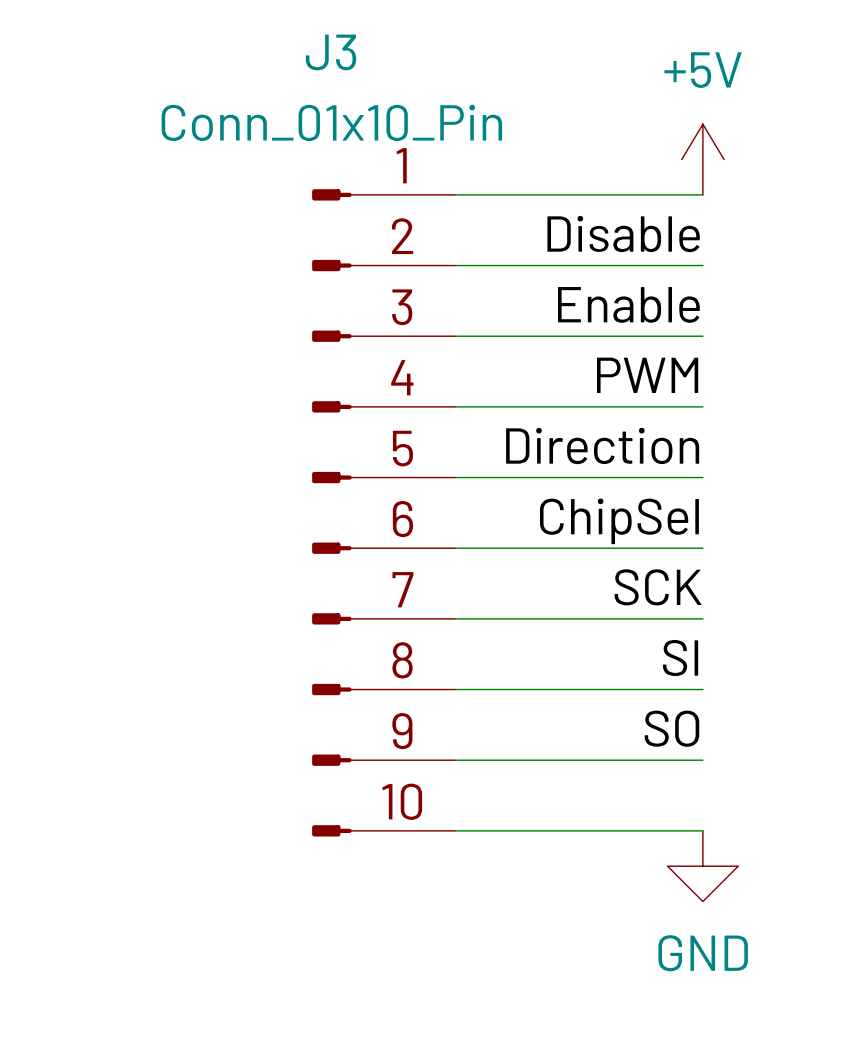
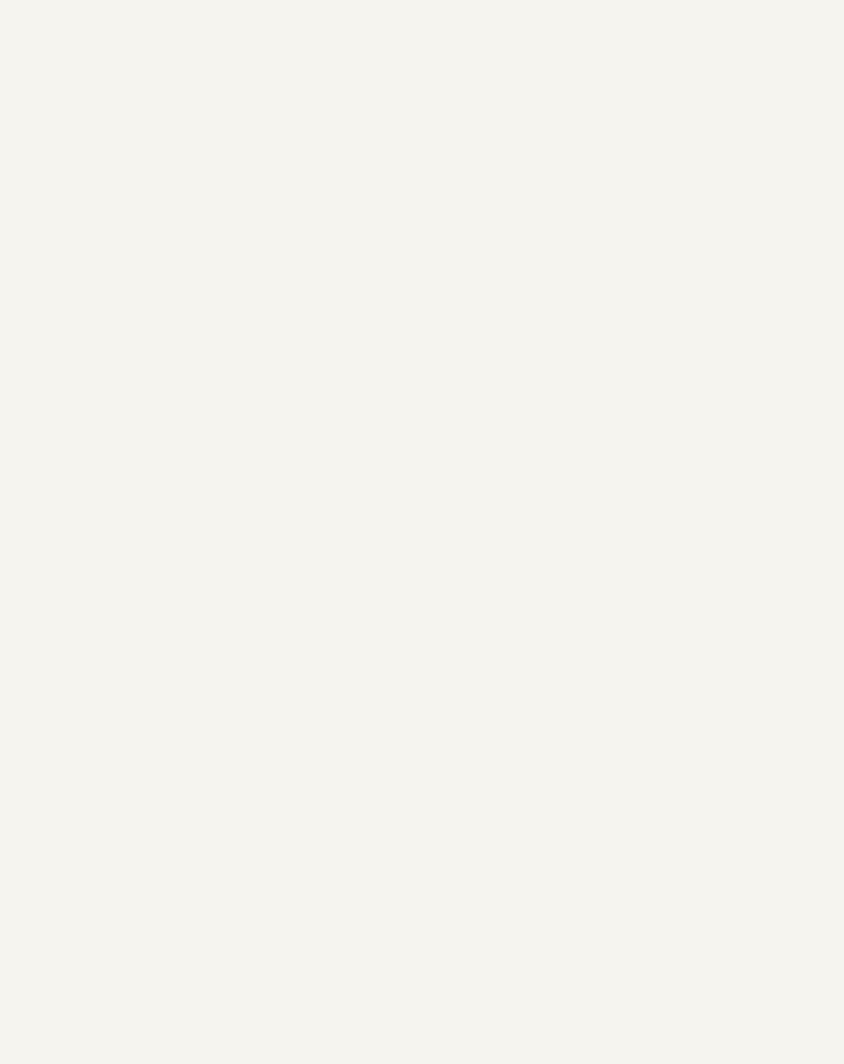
power symbol: +5V (702, 159) -> none
wire: (455, 194) (702, 194) -> none
label: Disable (623, 234) -> none
wire: (455, 265) (702, 265) -> none
label: Enable (628, 304) -> none
wire: (455, 336) (702, 336) -> none
label: PWM (647, 375) -> none
wire: (455, 406) (702, 406) -> none
label: Direction (602, 445) -> none
wire: (455, 477) (702, 477) -> none
J3: Conn_01x10_Pin (383, 512) -> none
label: ChipSel (619, 521) -> none
wire: (455, 548) (702, 548) -> none
label: SCK (658, 587) -> none
wire: (455, 618) (702, 618) -> none
label: SI (680, 658) -> none
wire: (455, 689) (702, 689) -> none
label: SO (671, 728) -> none
wire: (455, 760) (702, 760) -> none
wire: (455, 830) (702, 830) -> none
power symbol: GND (702, 866) -> none

